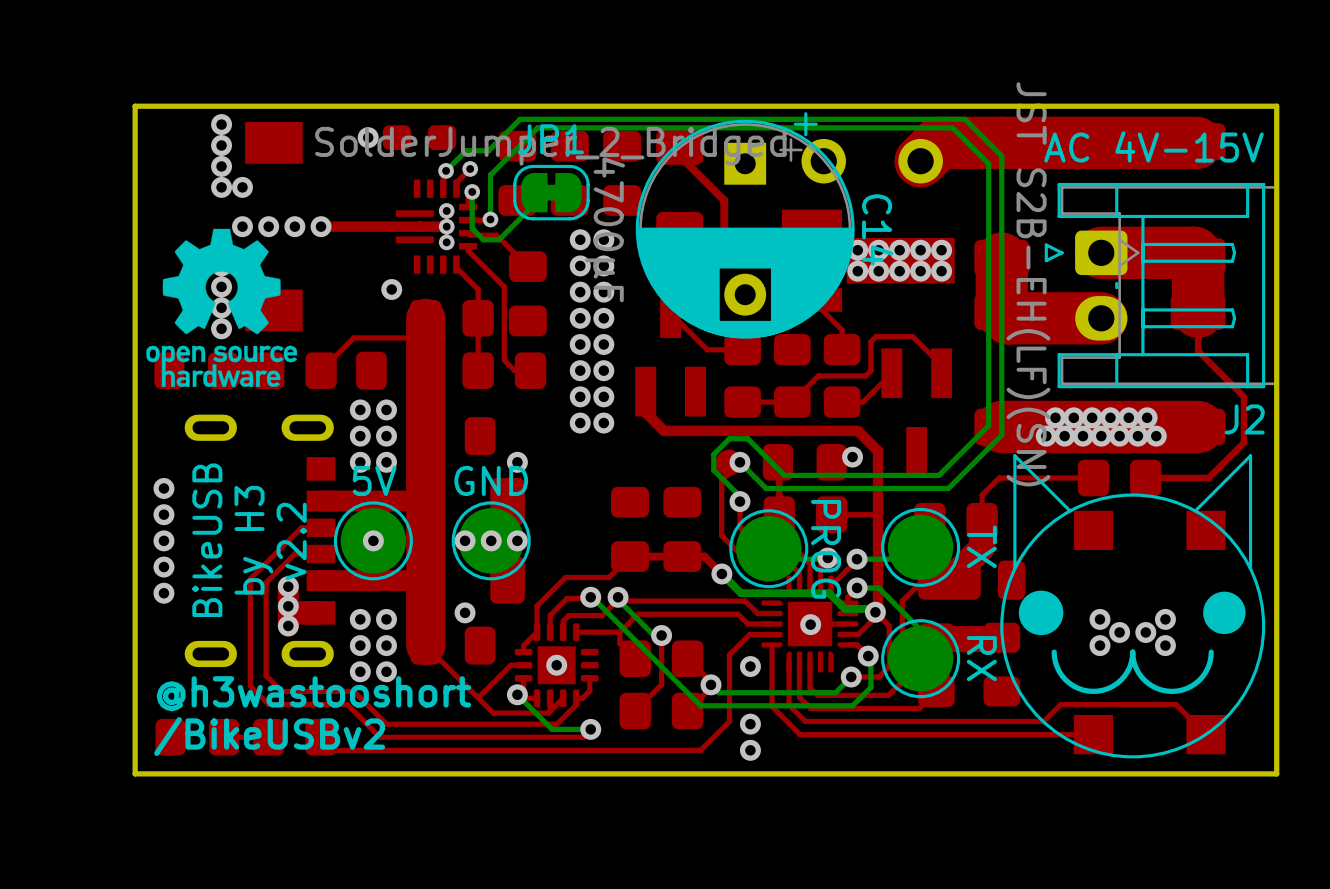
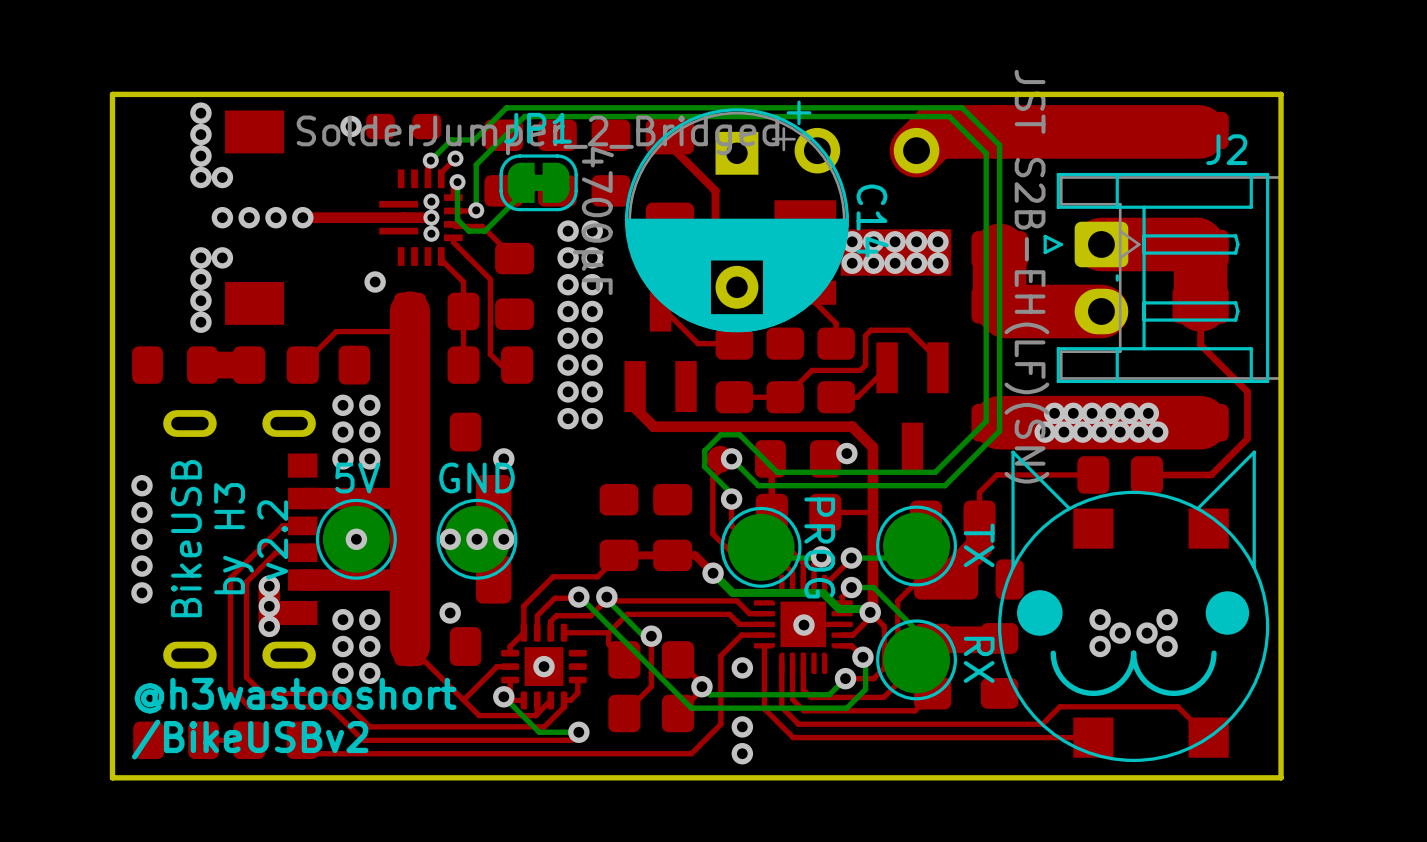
text: AC 4V-15V (1154, 146) -> none
drawing: [146, 228, 298, 388] -> none
J2 name position: J2 (1244, 419) -> J2 (1226, 149)

